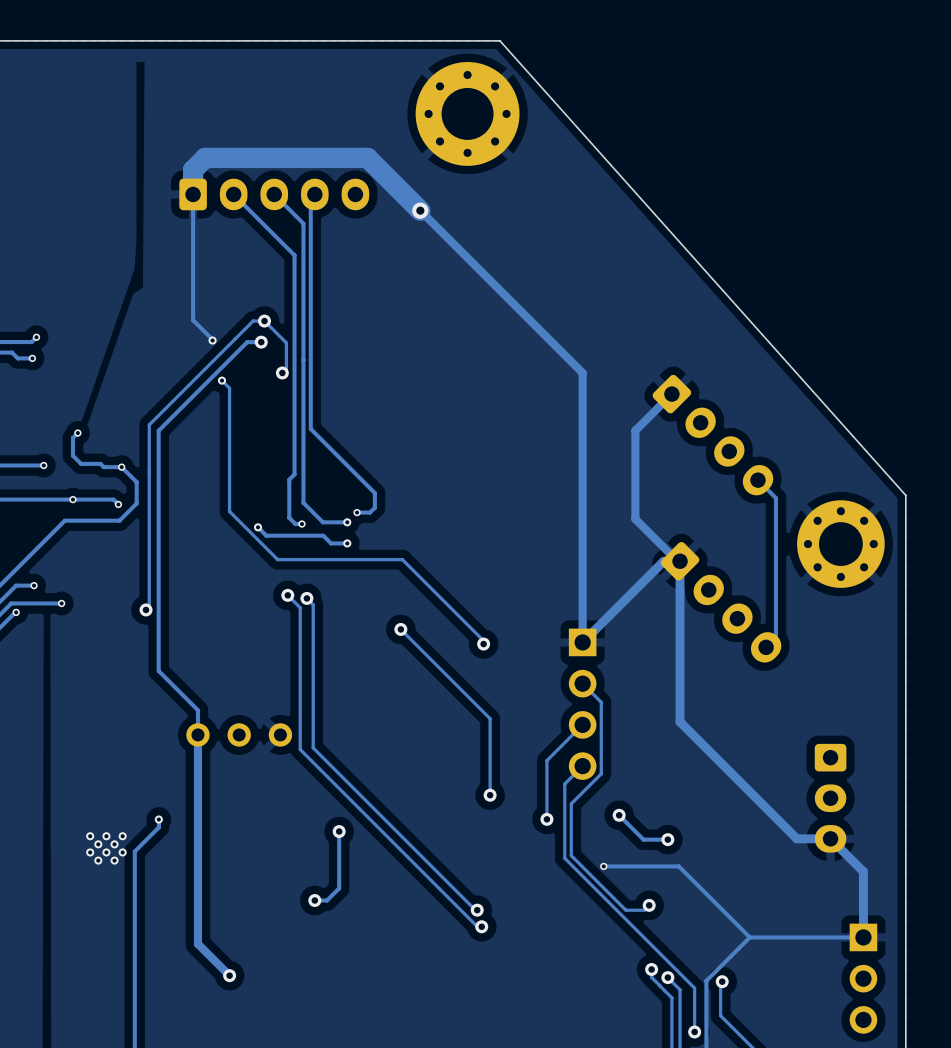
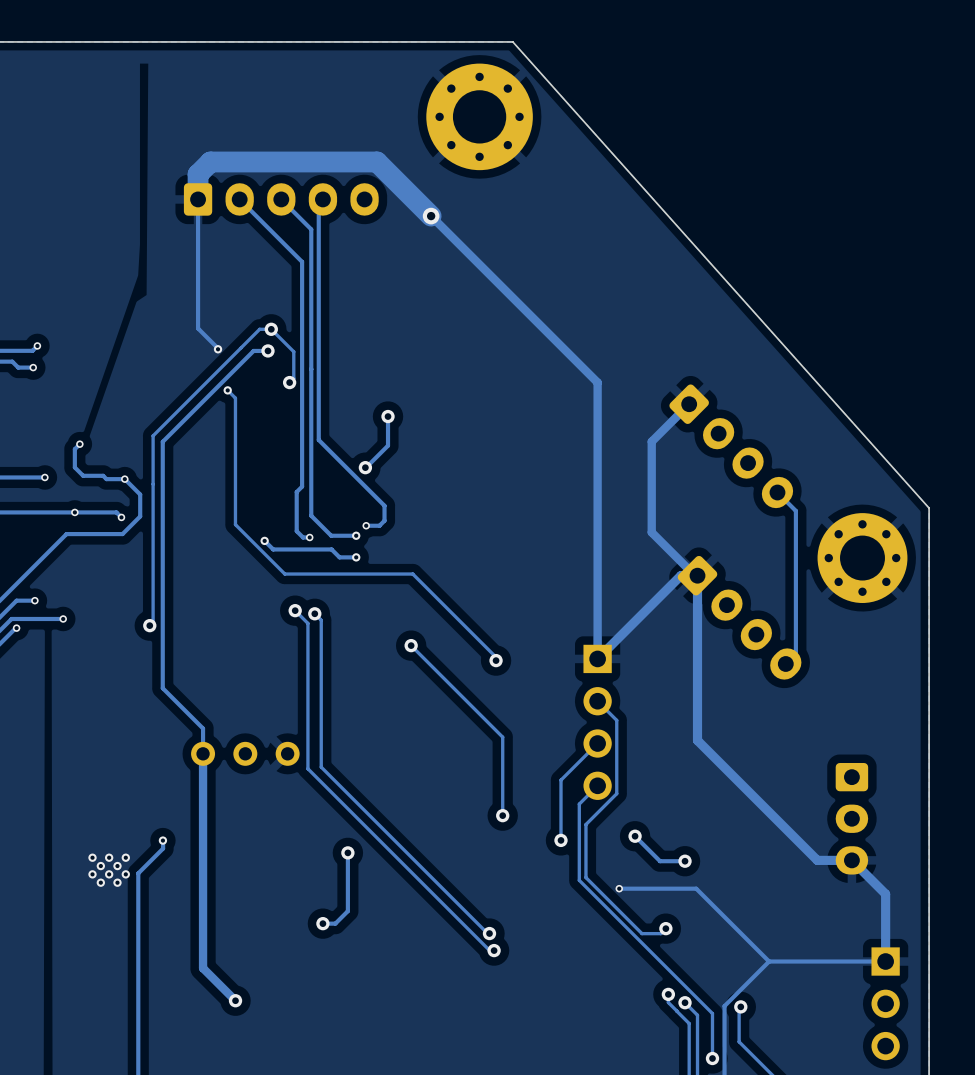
track: none -> (388, 416) (388, 445) (366, 467)
via: none -> (388, 416)
via: none -> (365, 467)

